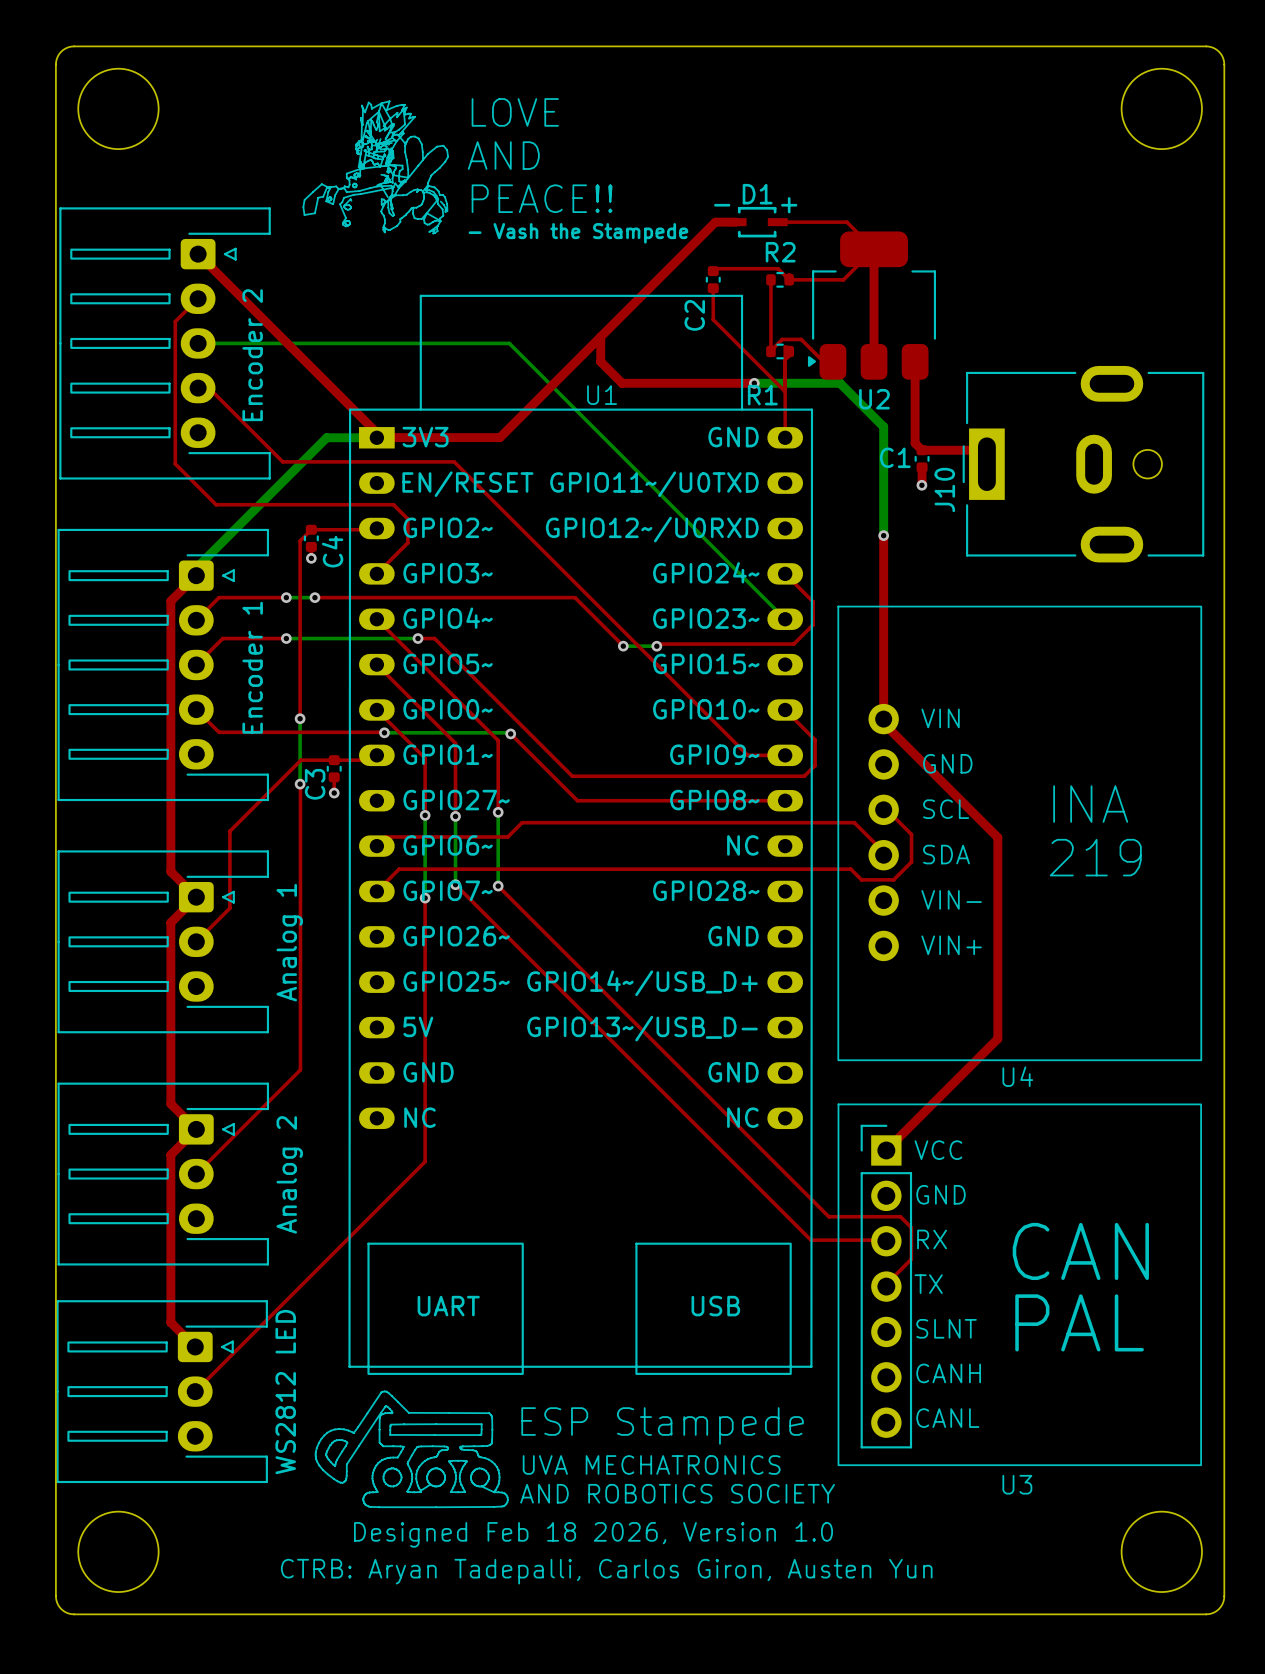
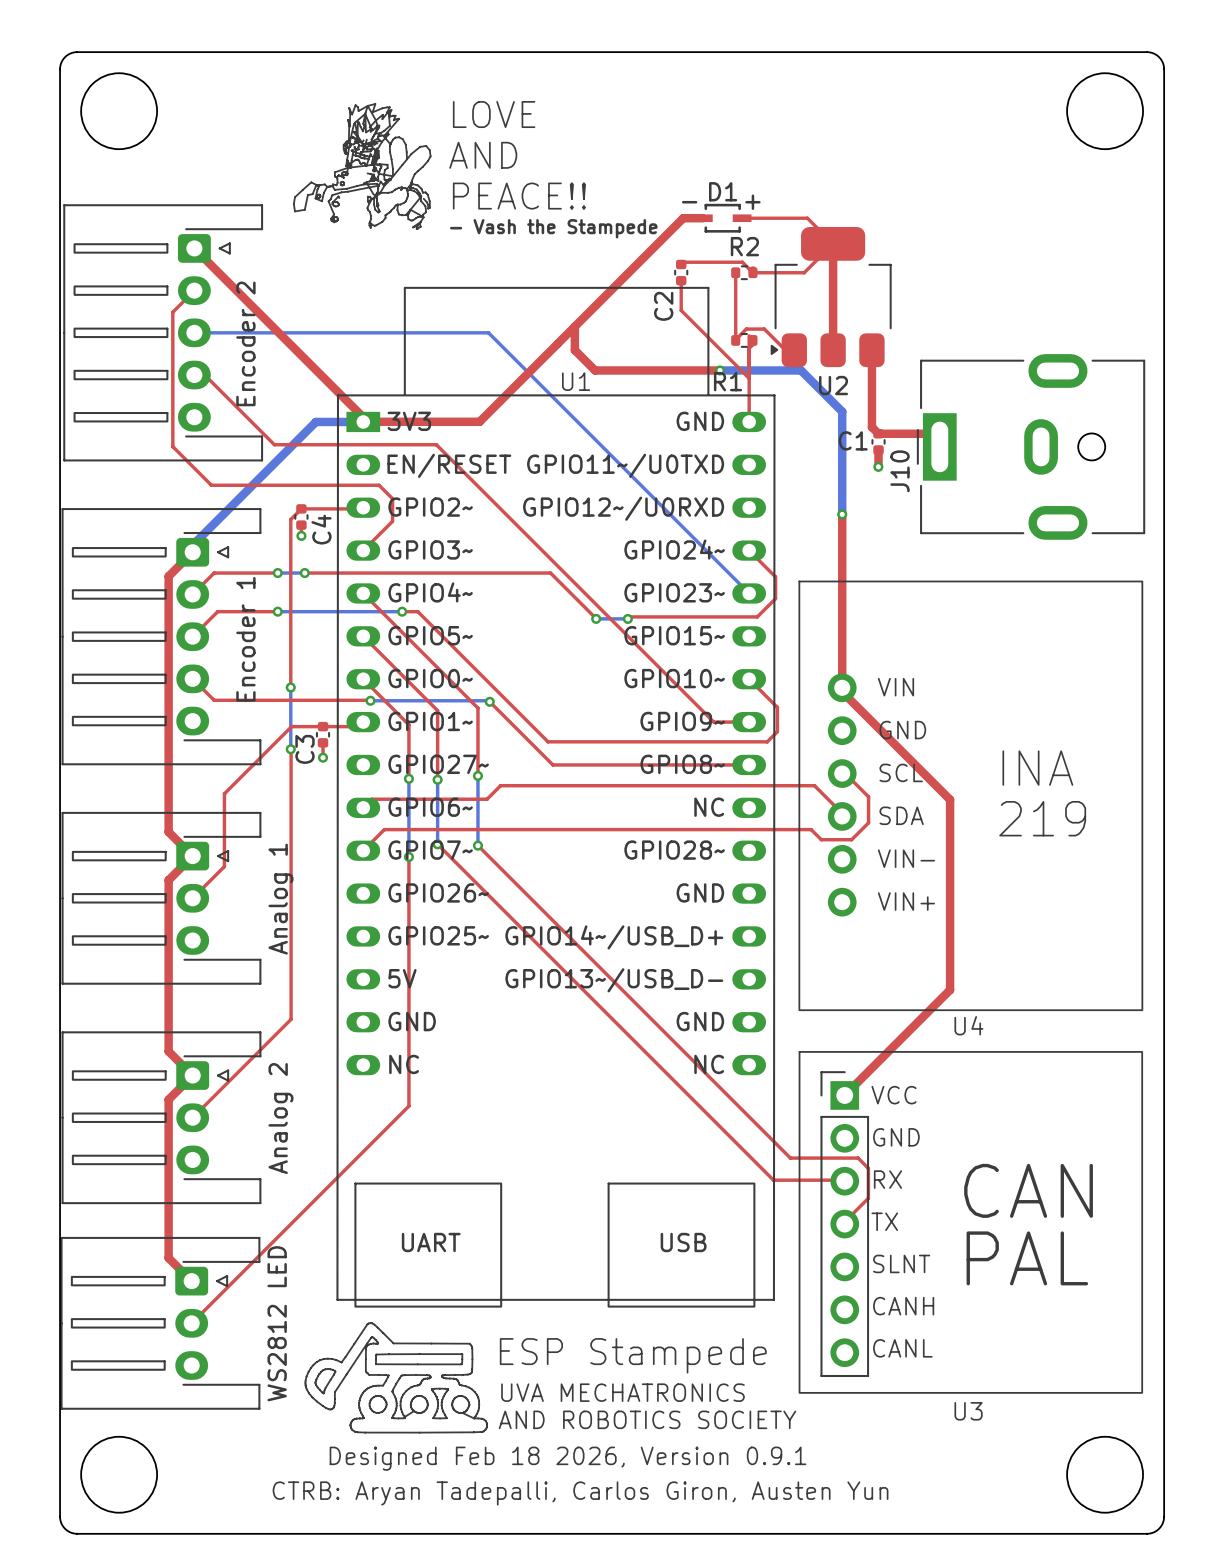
text: Designed Feb 18 2026, Version 1.0 (593, 1534) -> Designed Feb 18 2026, Version 0.9.1 (568, 1458)

